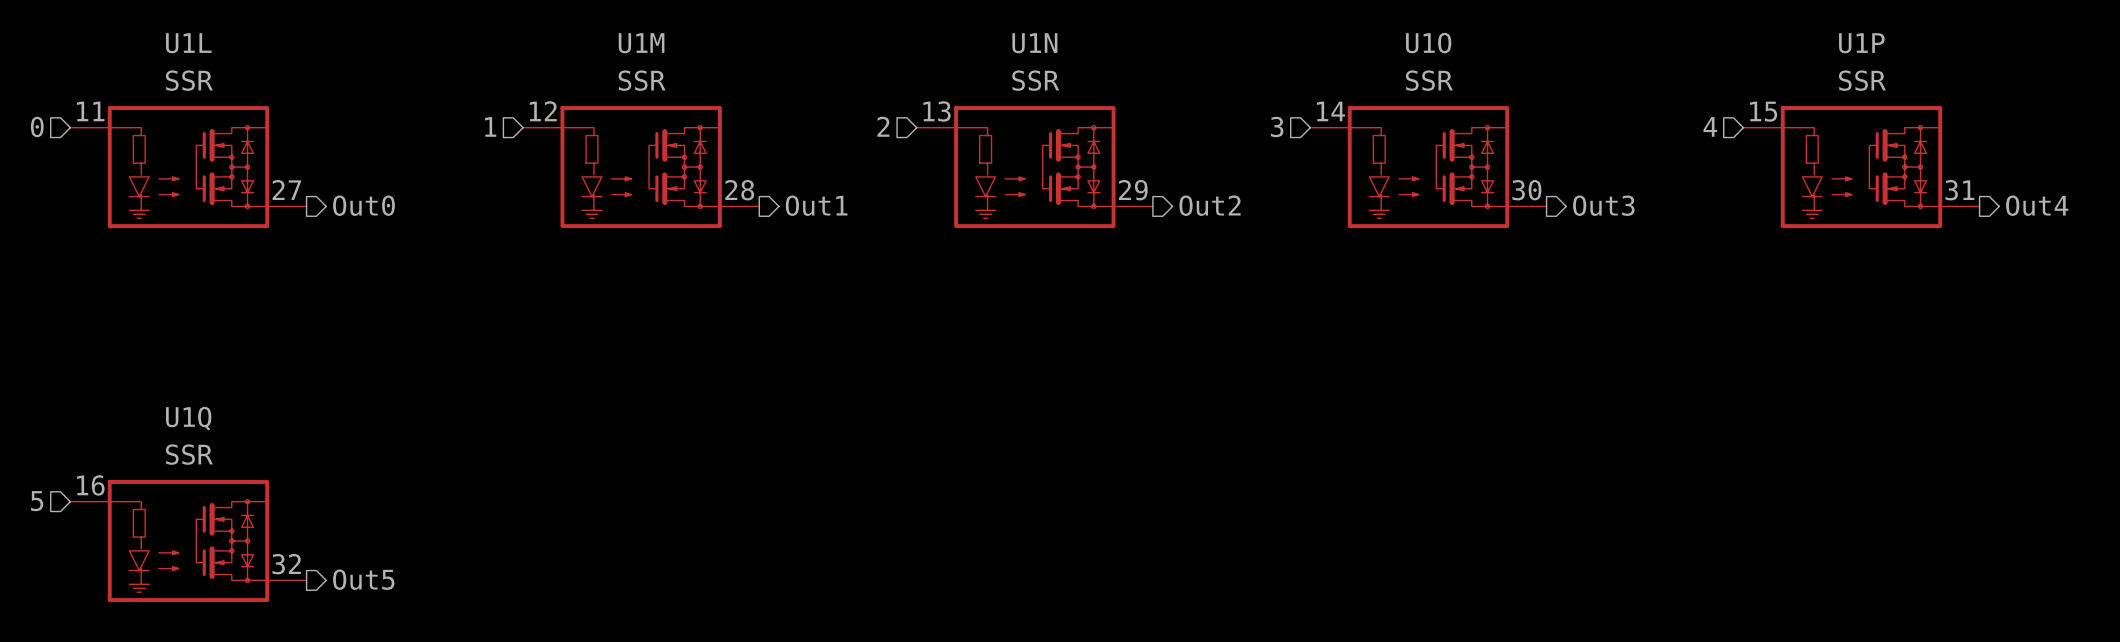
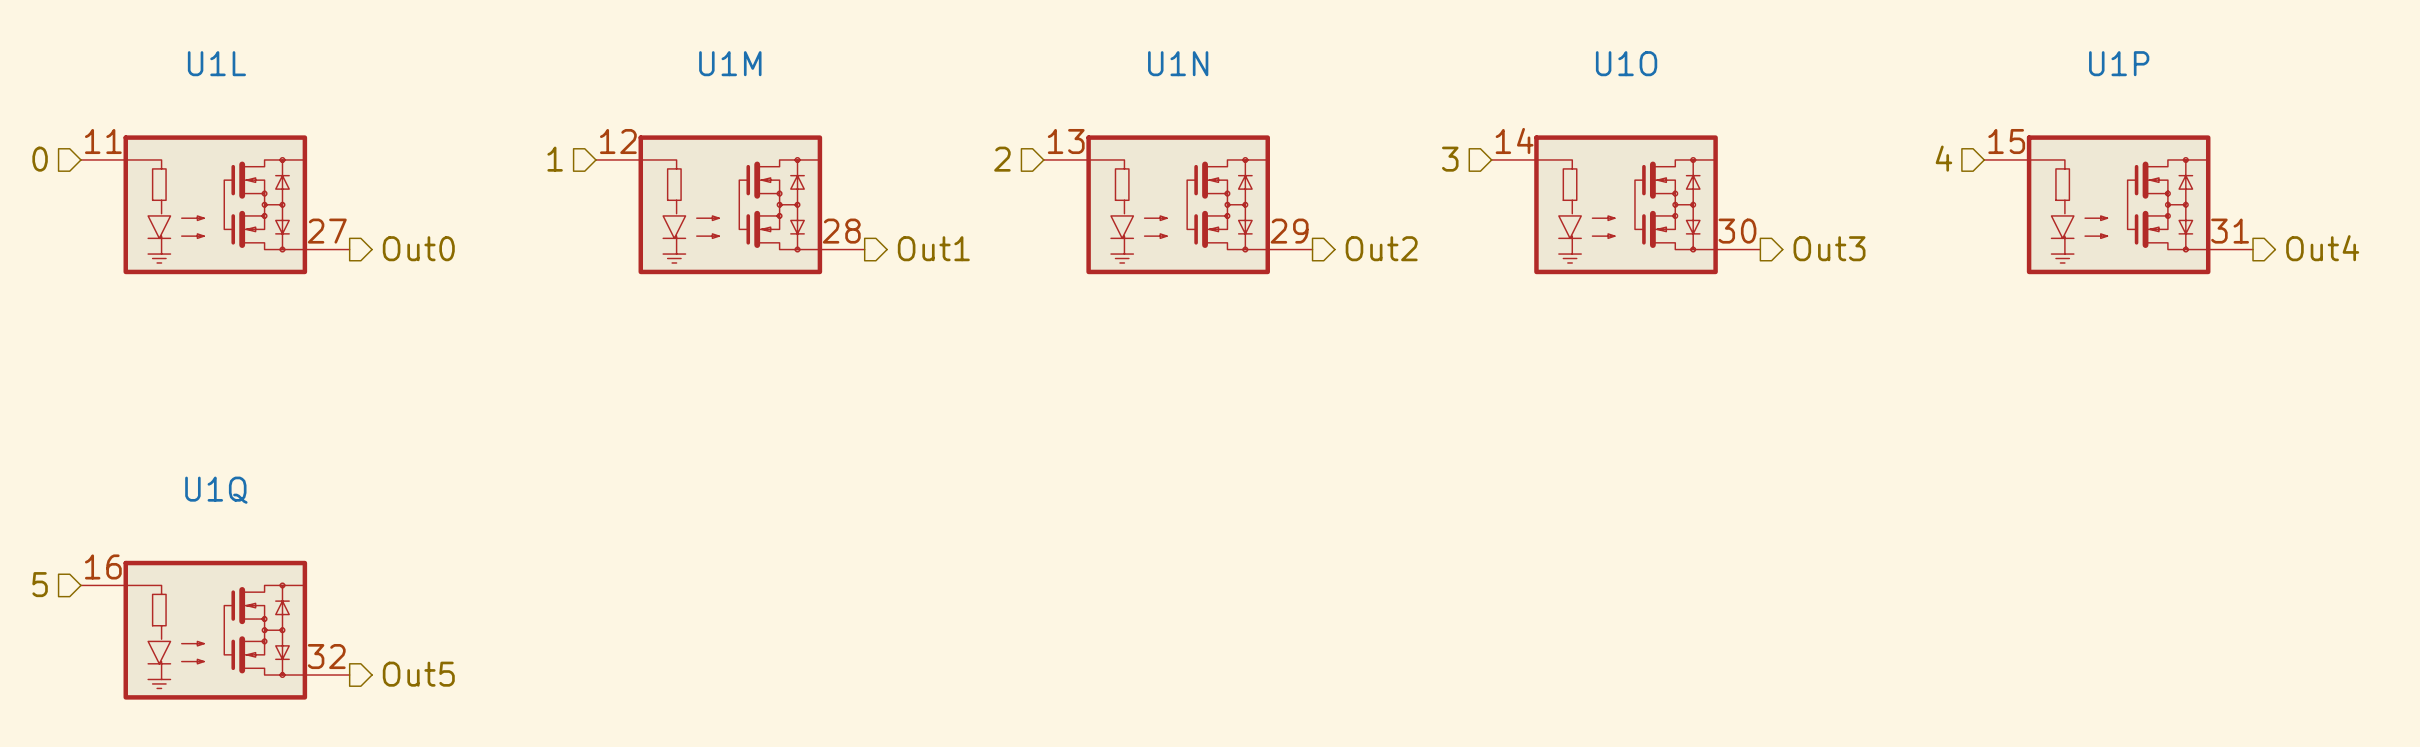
U1L value: SSR (189, 80) -> none
U1M value: SSR (642, 80) -> none
U1N value: SSR (1035, 80) -> none
U1O value: SSR (1429, 80) -> none
U1P value: SSR (1862, 80) -> none
U1Q value: SSR (189, 454) -> none

